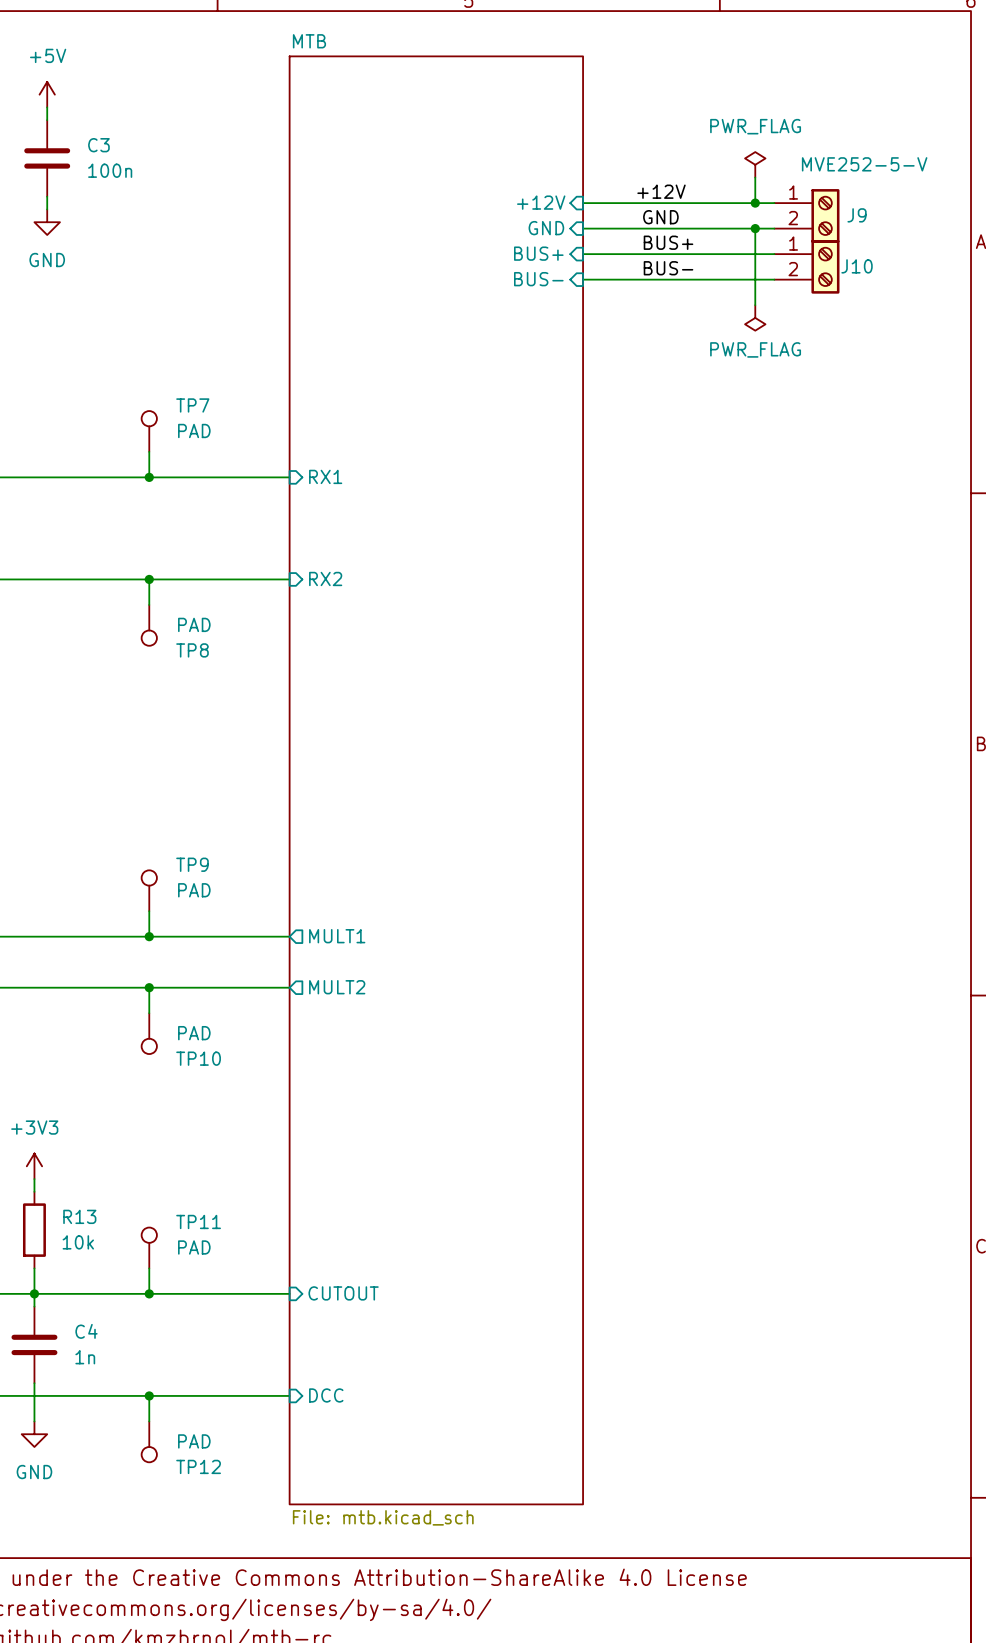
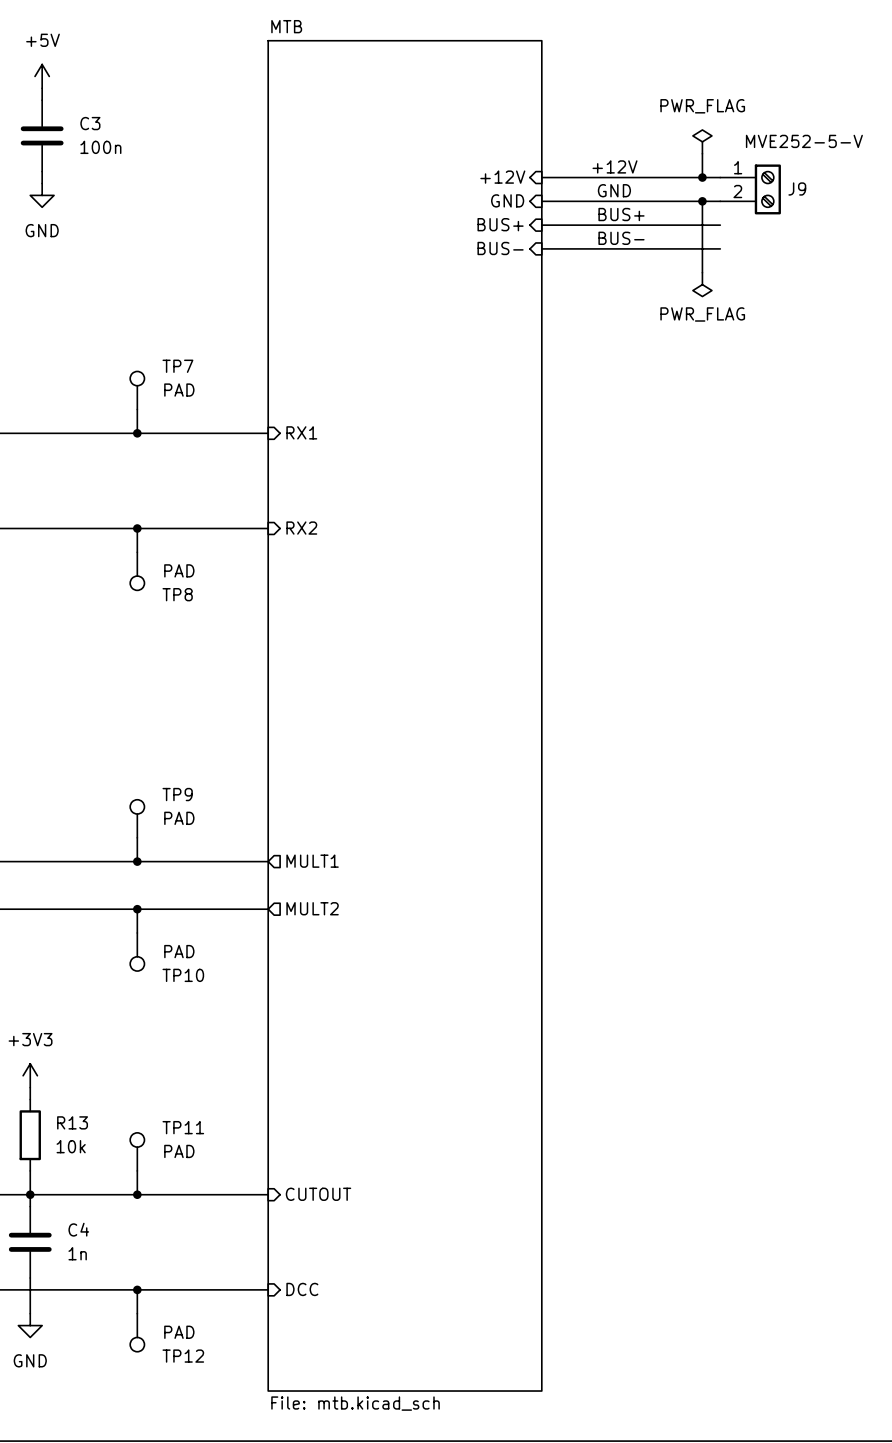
J10: (806, 266) -> none

